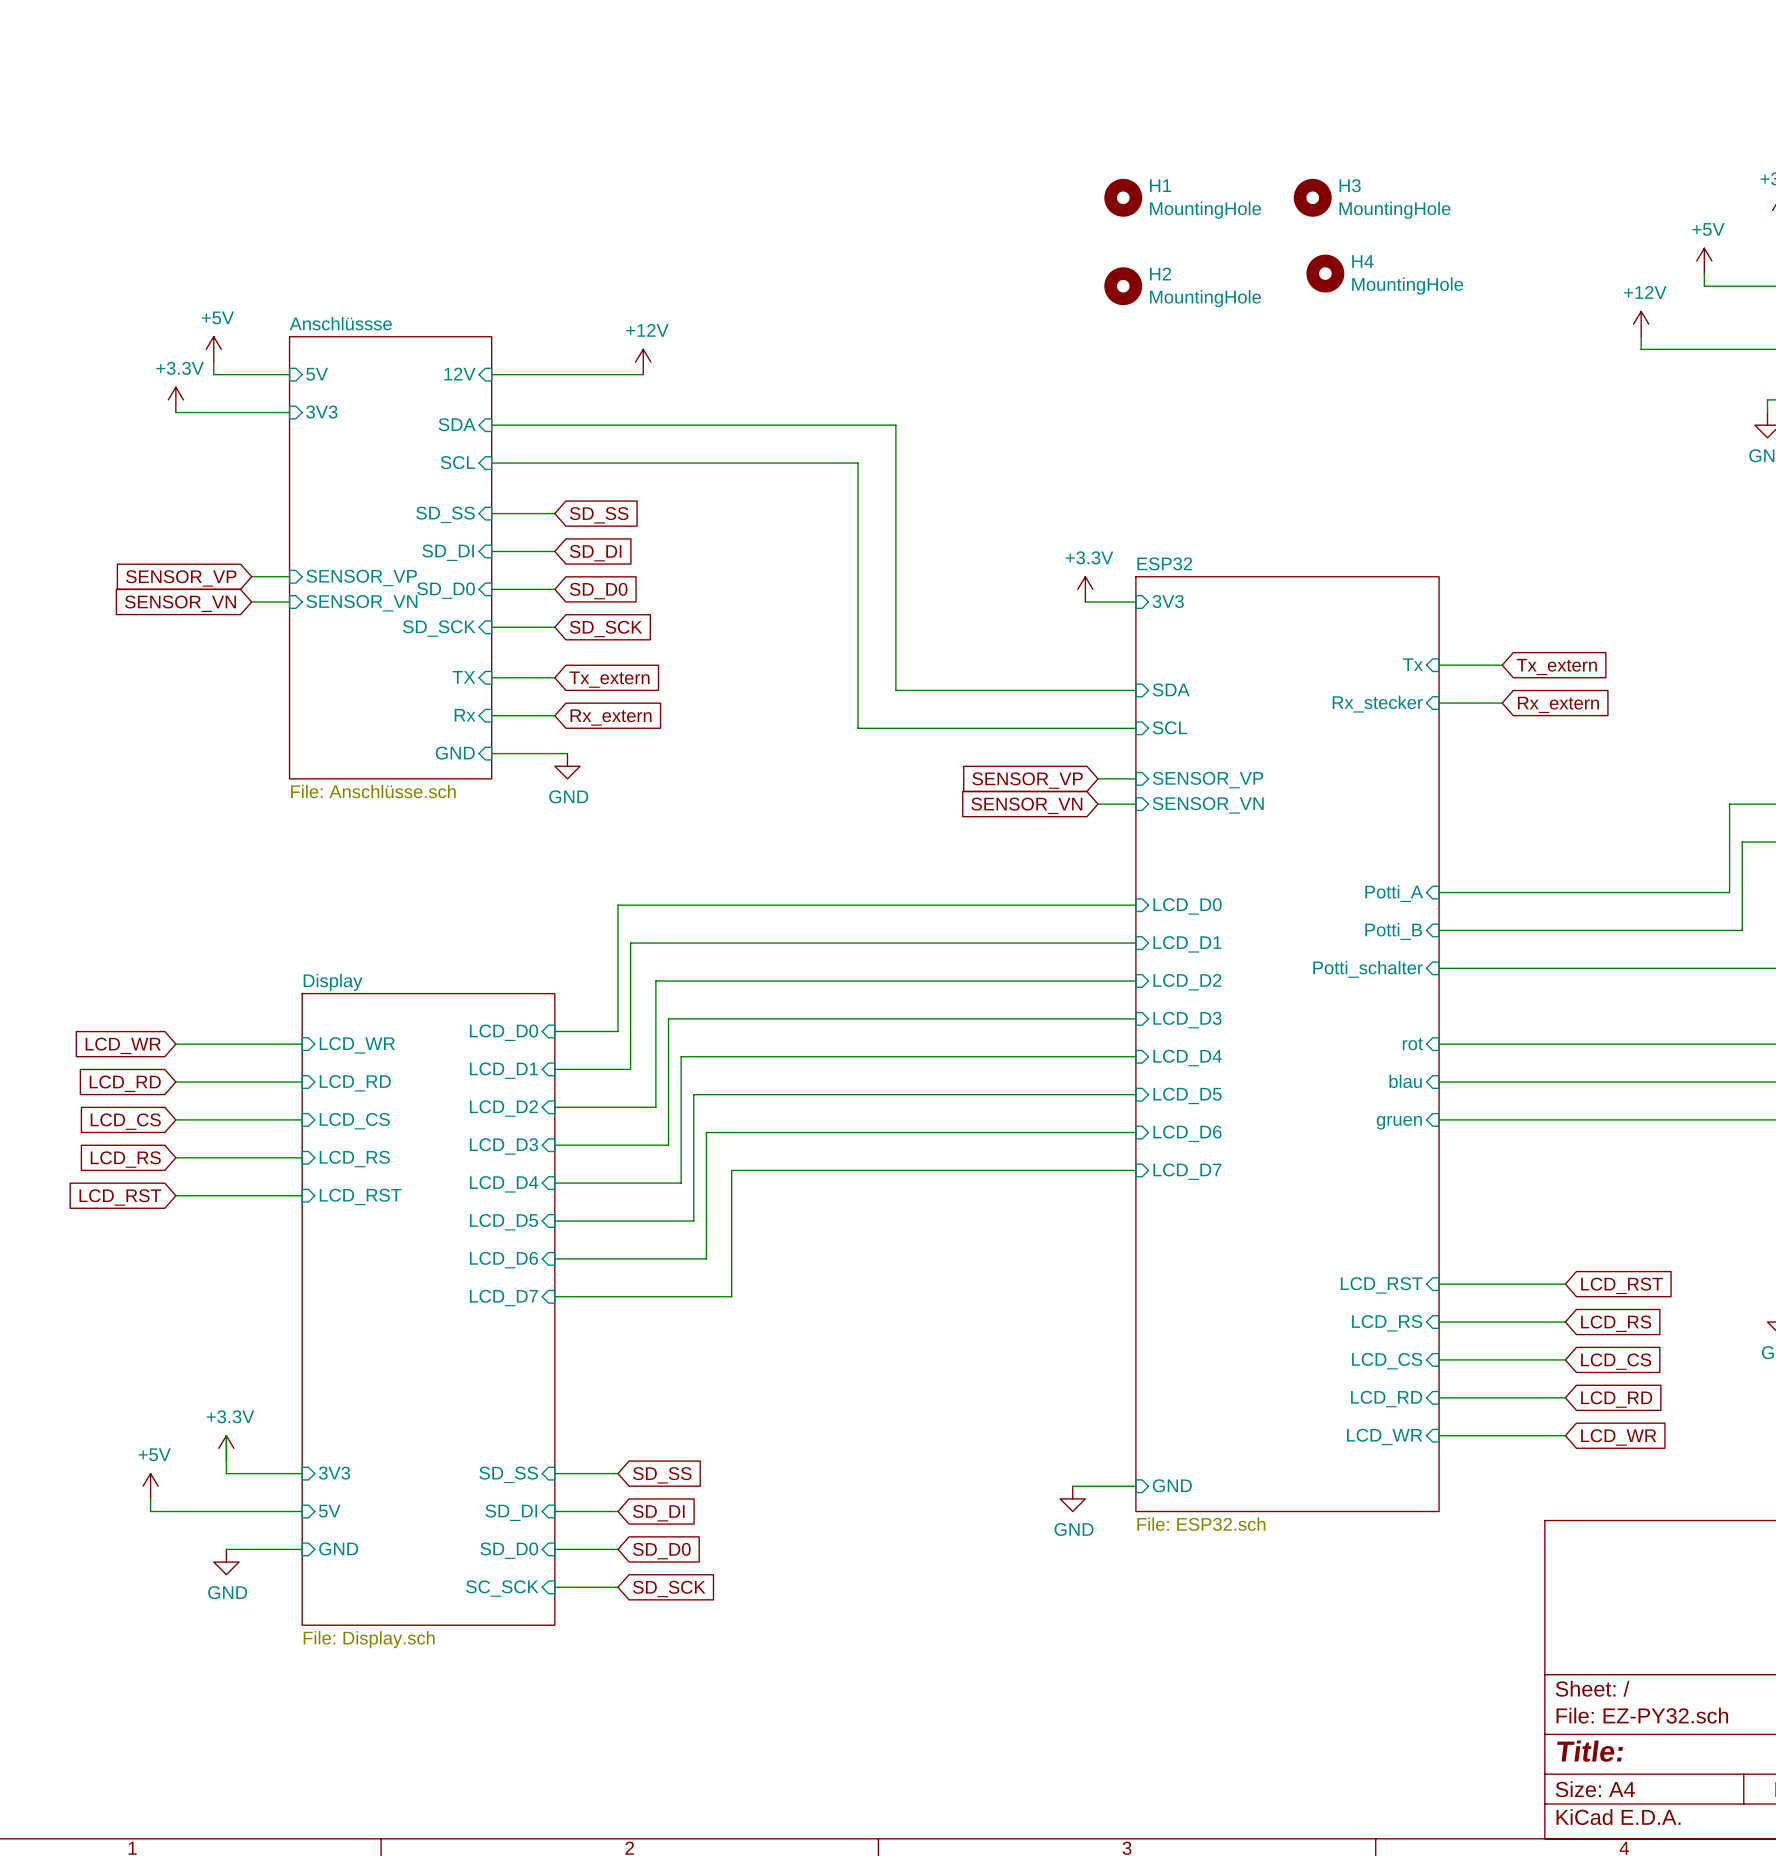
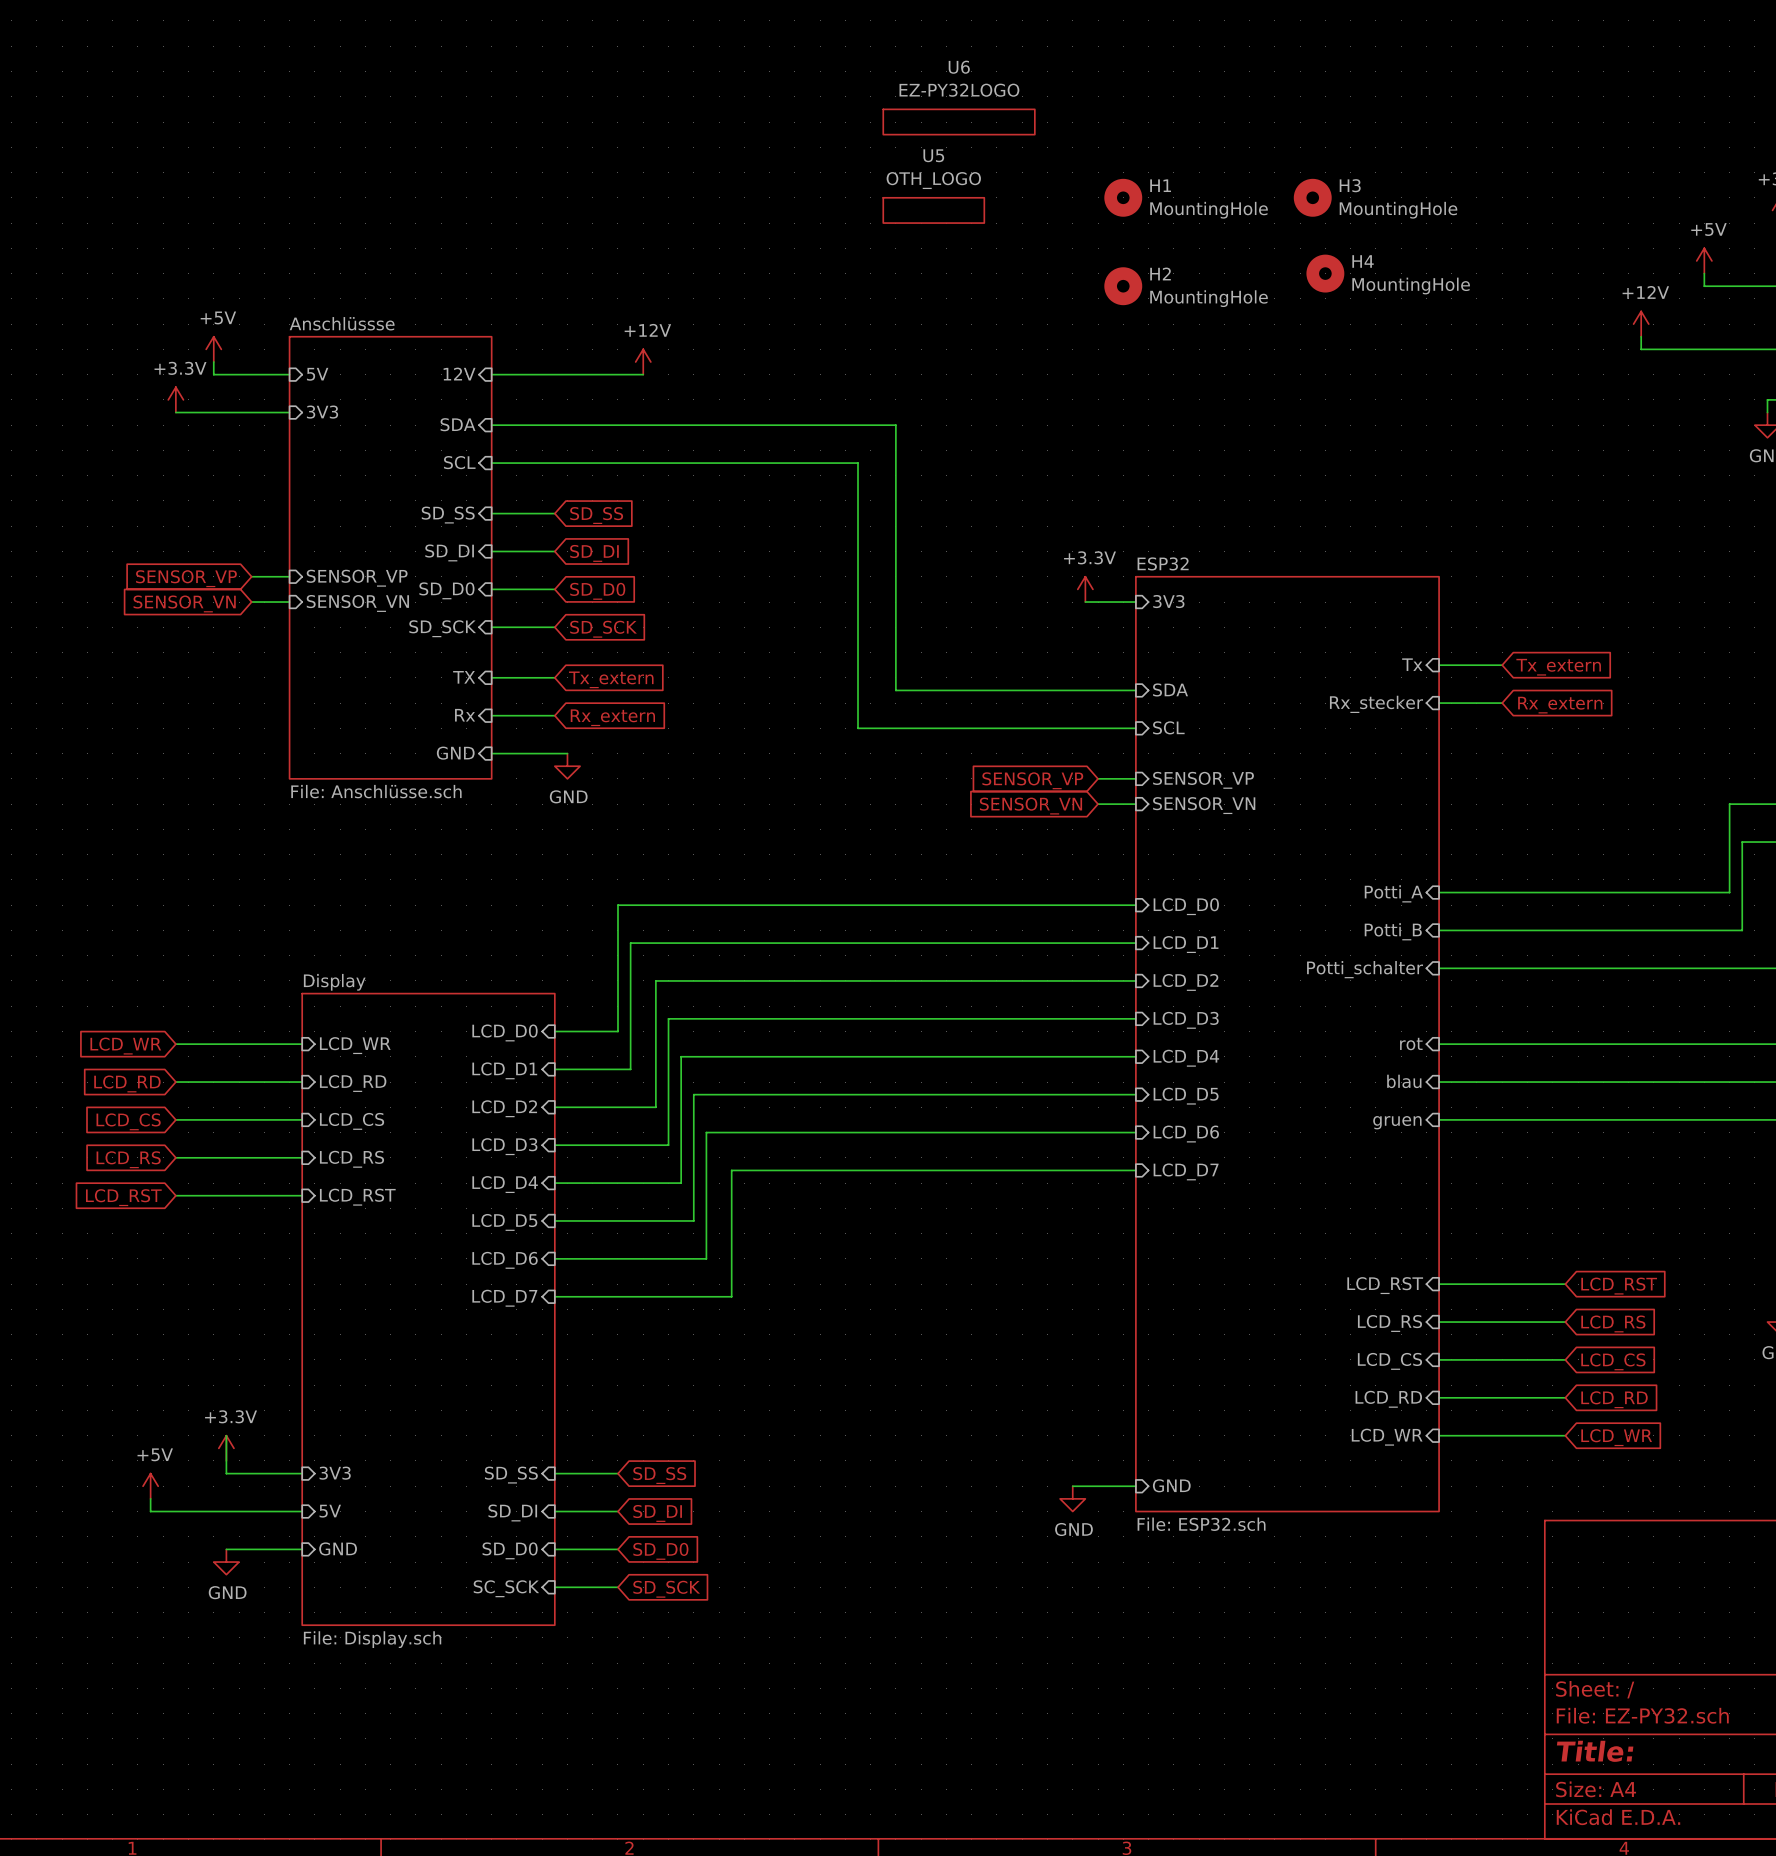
U6: none -> EZ-PY32LOGO (959, 122)
U5: none -> OTH_LOGO (933, 210)

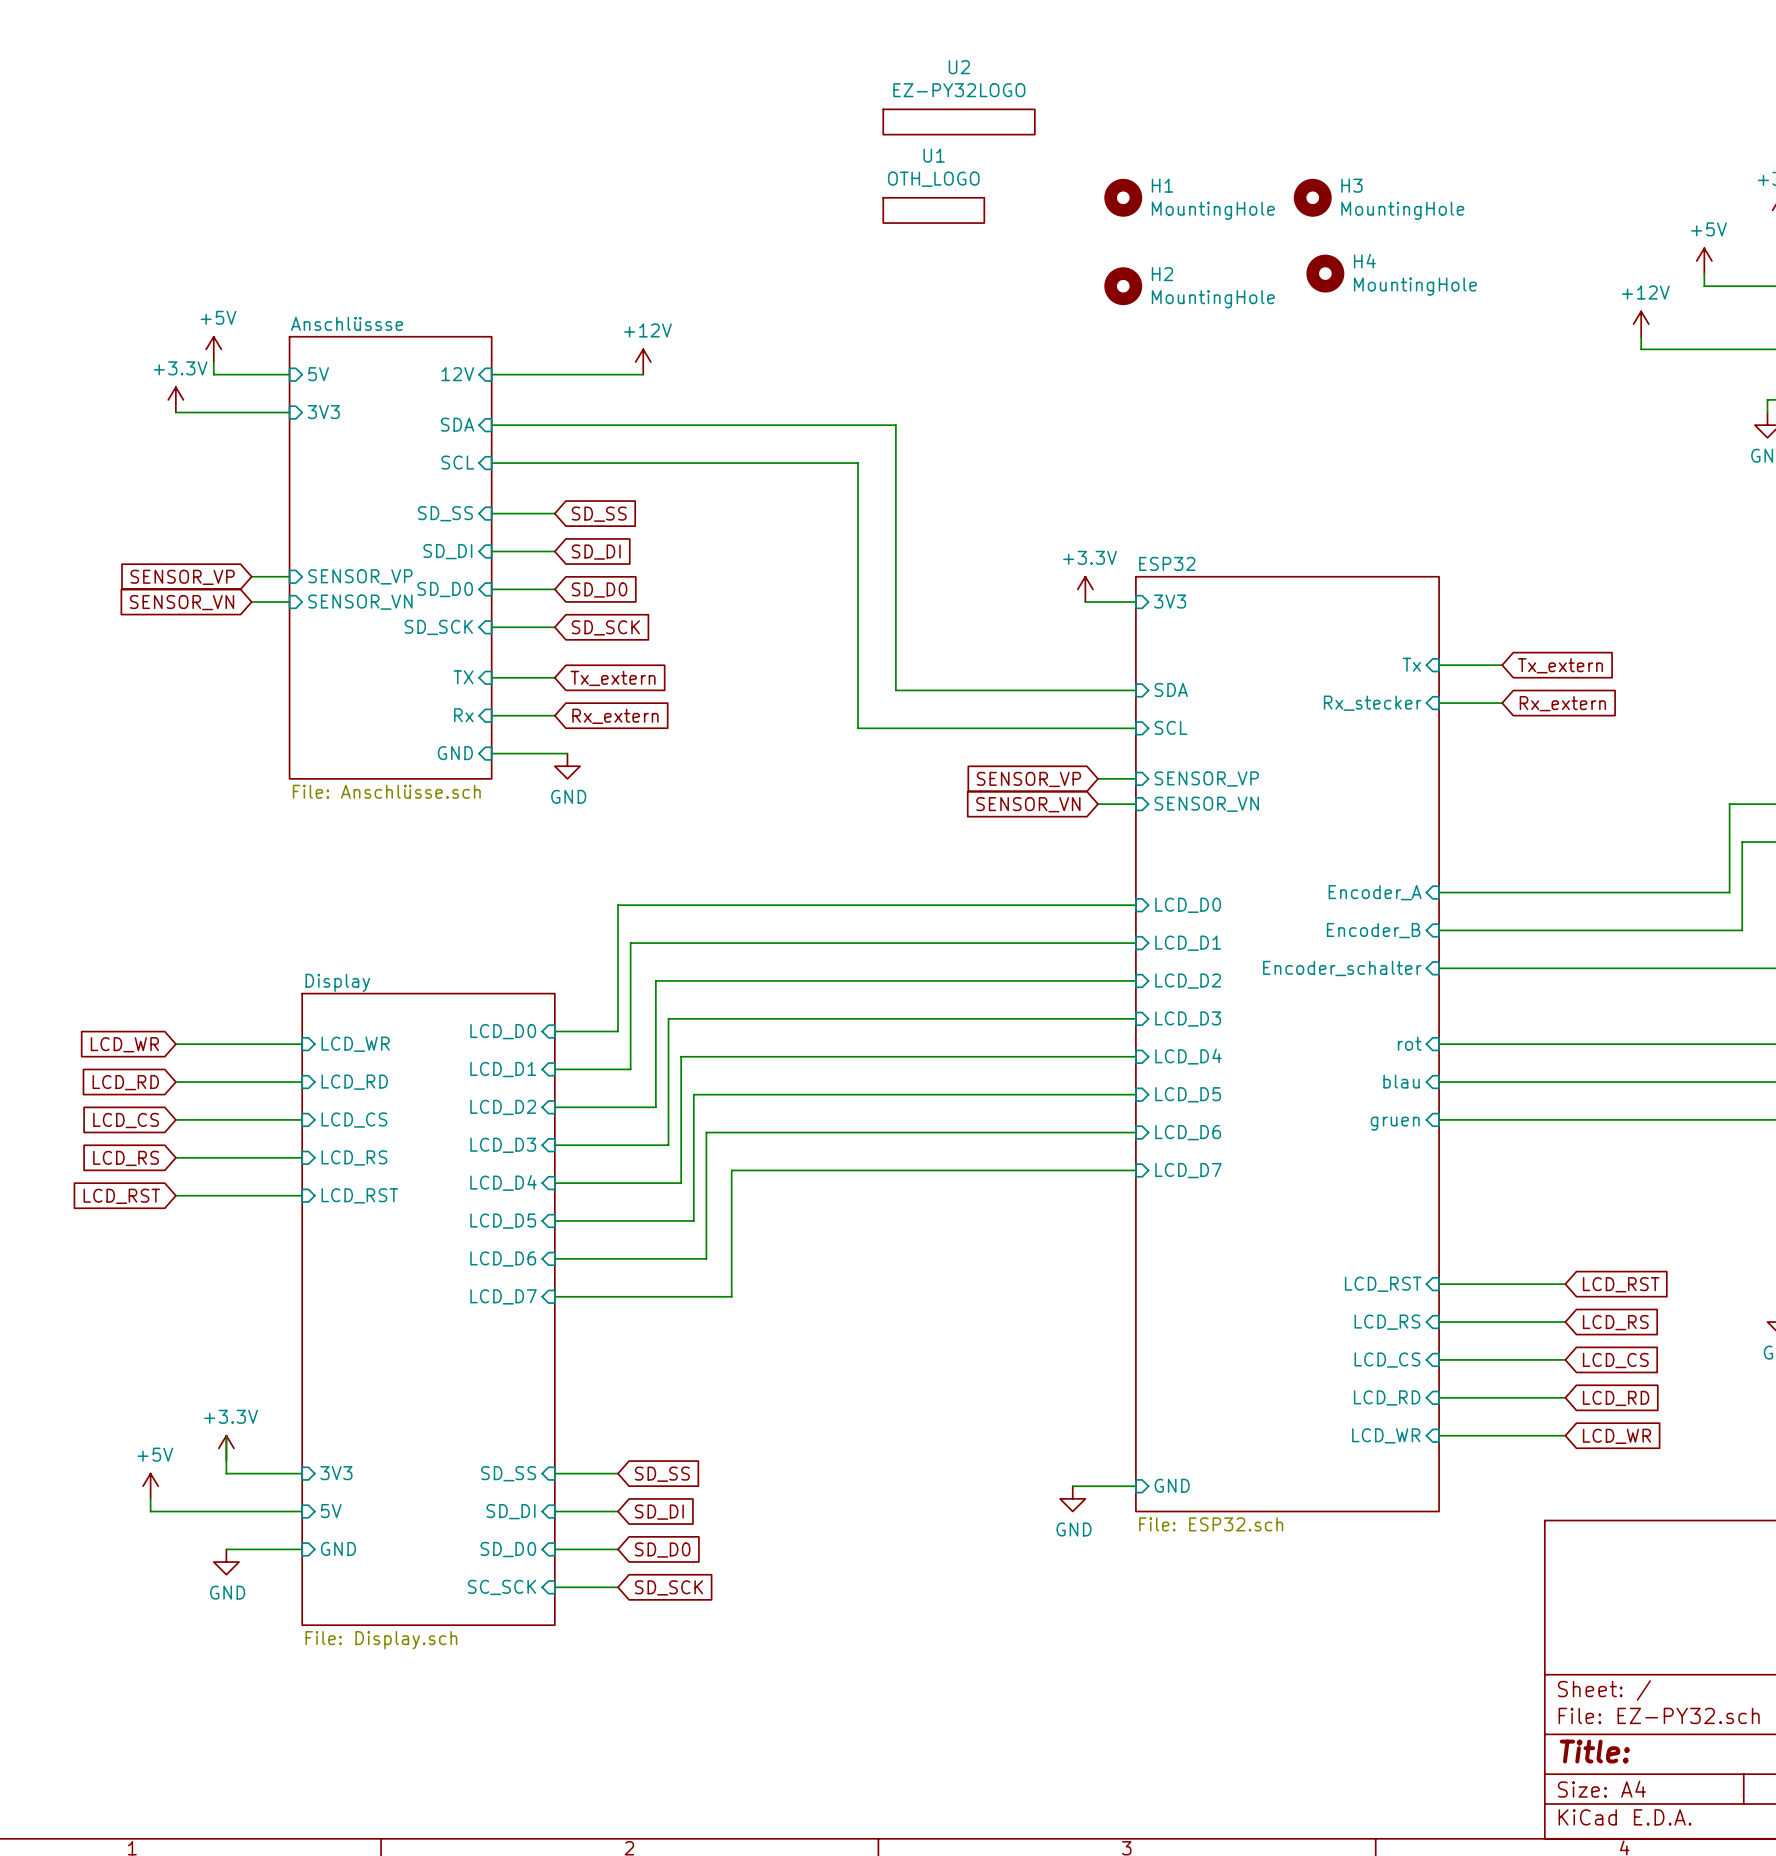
U6 name: U6 (959, 67) -> U2 (959, 67)
U5 name: U5 (933, 155) -> U1 (934, 155)
sheet pin: Potti_A (1393, 893) -> Encoder_A (1375, 892)
sheet pin: Potti_B (1393, 931) -> Encoder_B (1373, 930)
sheet pin: Potti_schalter (1365, 969) -> Encoder_schalter (1342, 968)

